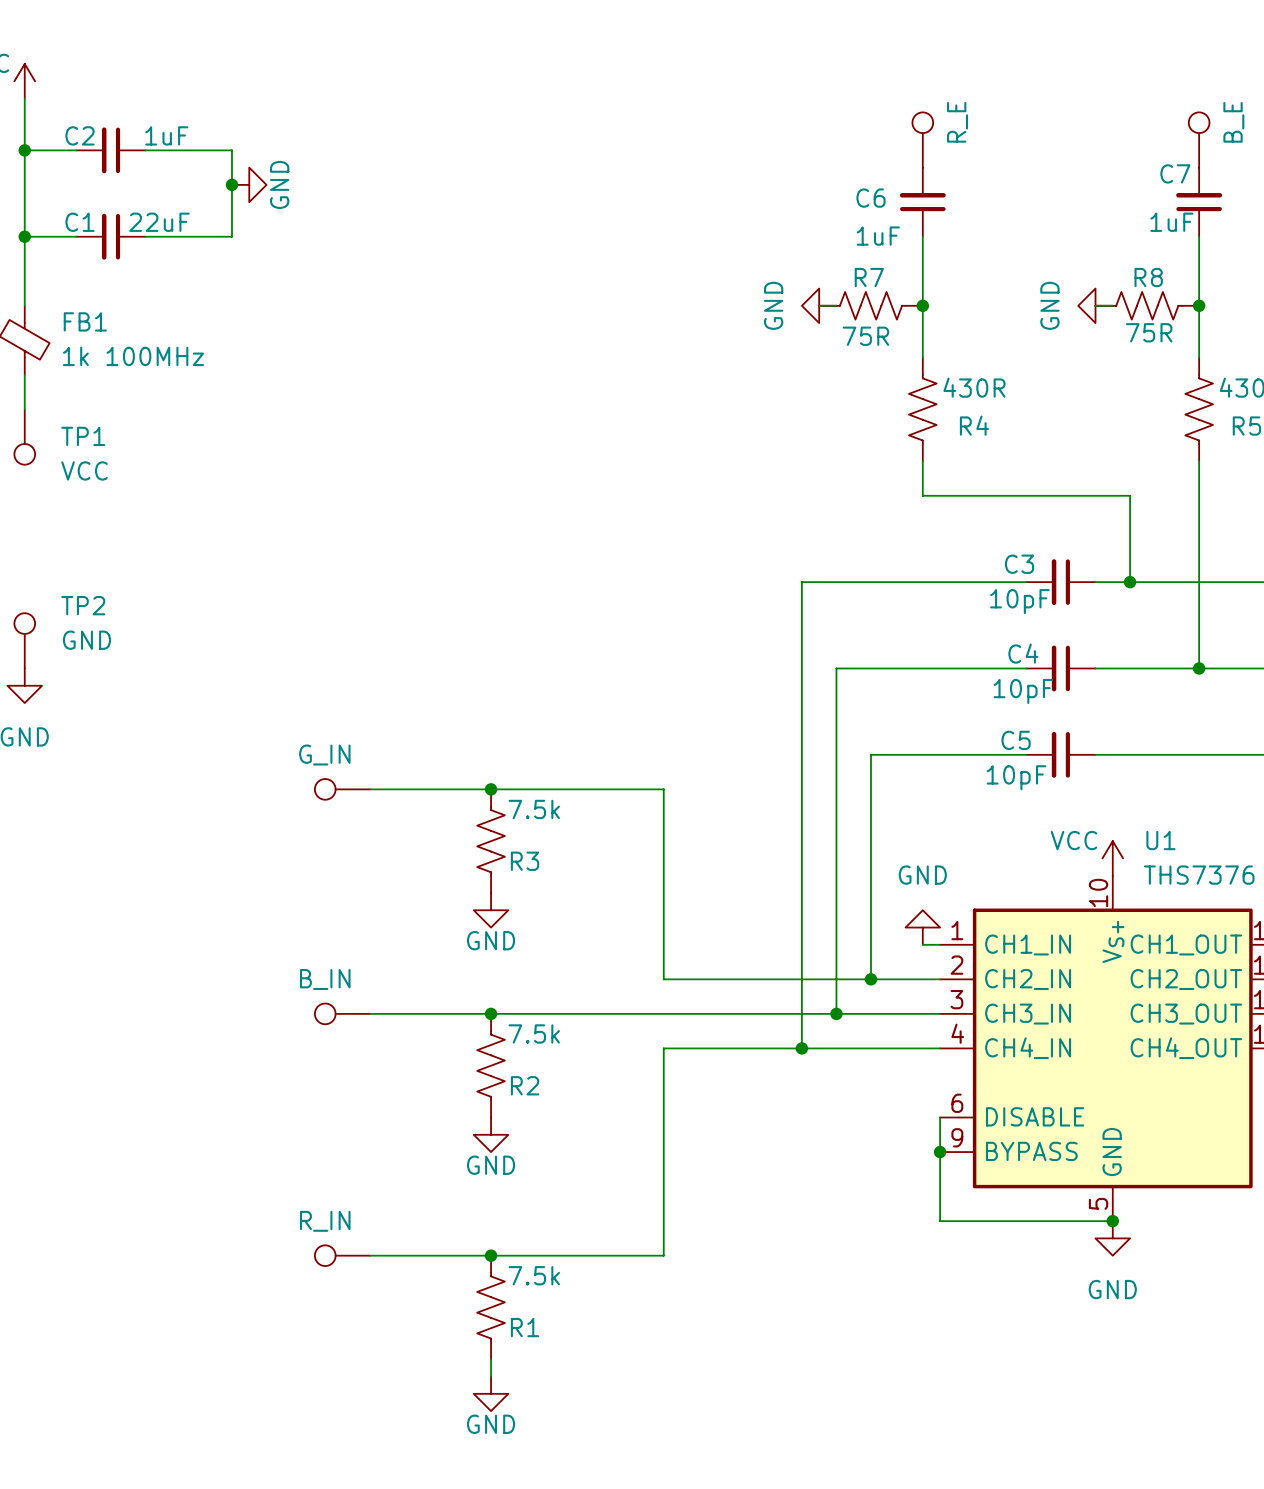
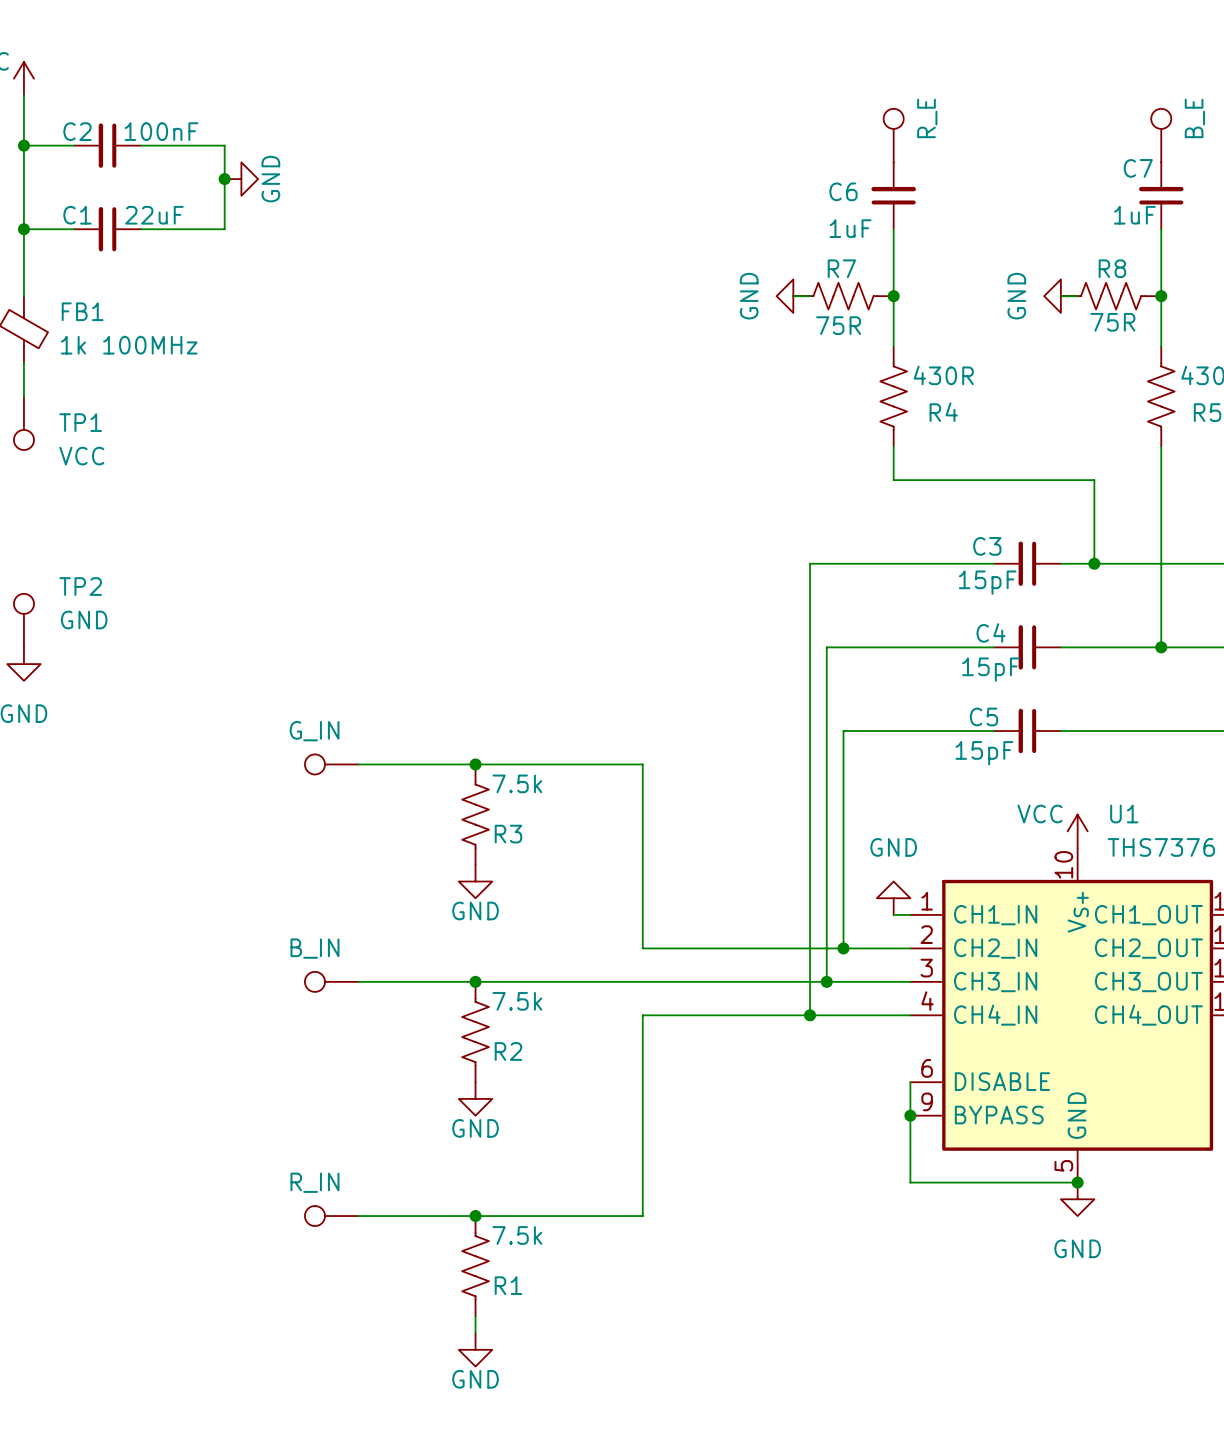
C2 value: 1uF (166, 135) -> 100nF (161, 131)
wire: (836, 582) (801, 582) (801, 1048) -> none
C3 value: 10pF (1019, 601) -> 15pF (987, 582)
wire: (836, 668) (853, 668) -> (810, 647) (810, 563)
wire: none -> (826, 647) (826, 981)
C4 value: 10pF (1023, 691) -> 15pF (991, 669)
C5 value: 10pF (1016, 777) -> 15pF (984, 753)
wire: none -> (810, 981) (810, 1015)
junction: (836, 1013) -> none
junction: none -> (826, 981)
junction: (801, 1048) -> none
junction: none -> (810, 1015)

